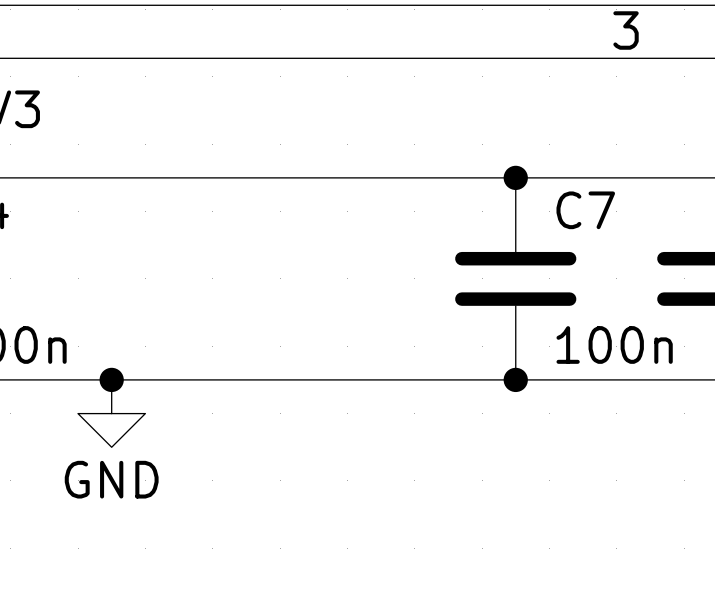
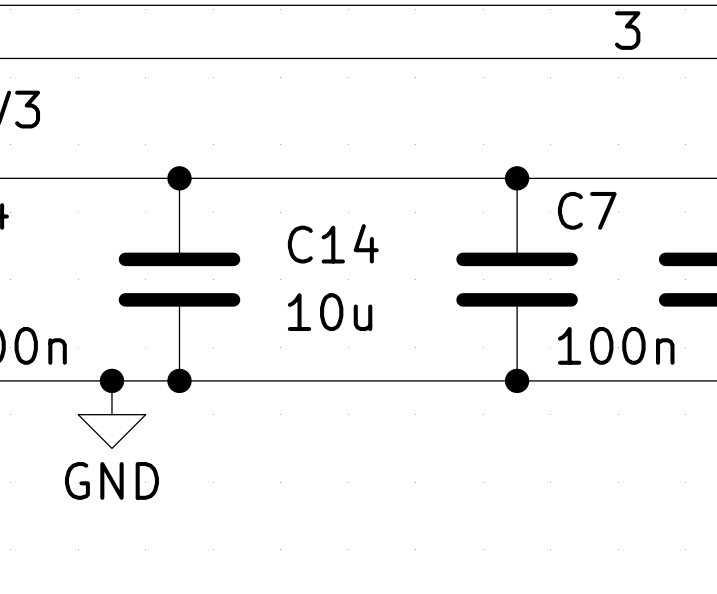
junction: none -> (179, 178)
C14: none -> 10u (179, 279)
junction: none -> (179, 380)

